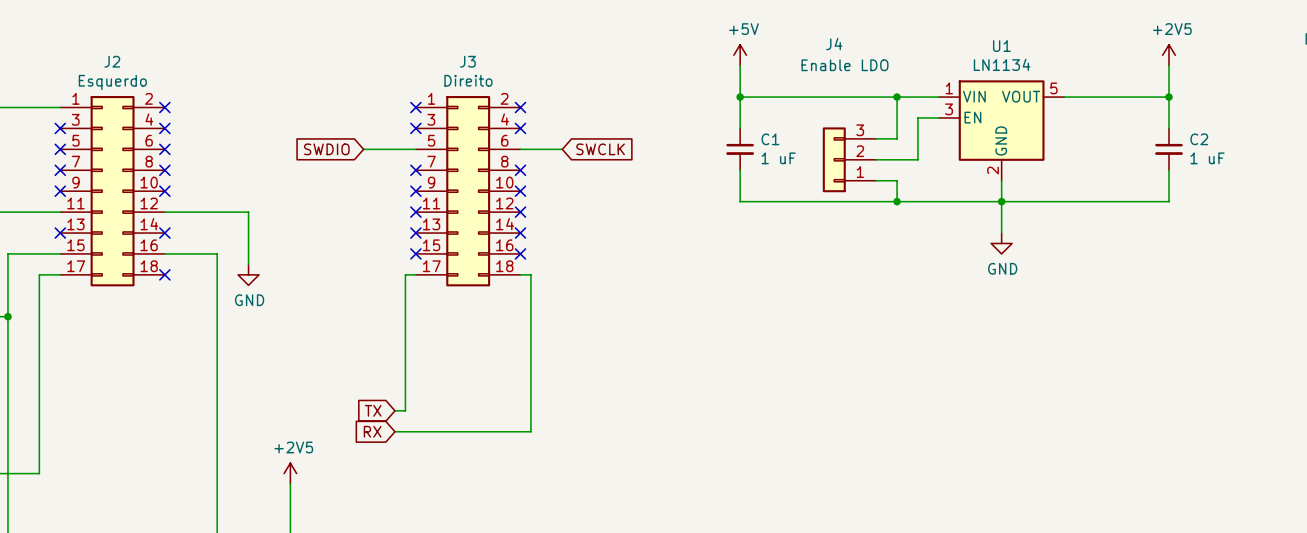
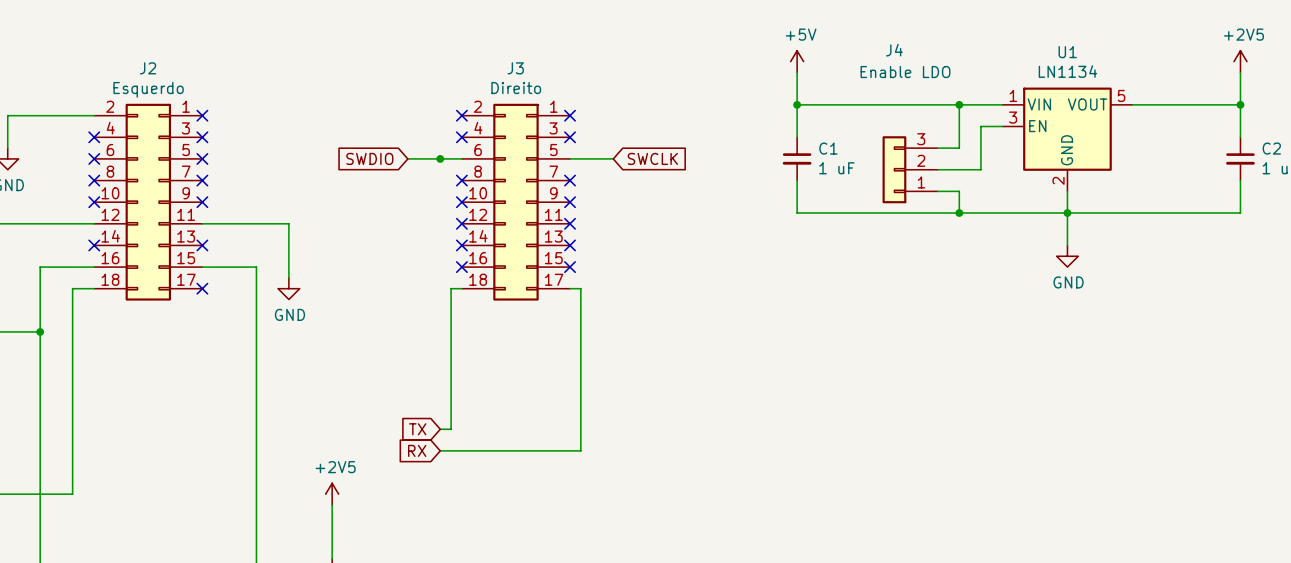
junction: none -> (440, 158)
J2 flip: as is (112, 191) -> left-right (148, 202)
J3 flip: as is (468, 191) -> left-right (515, 202)

